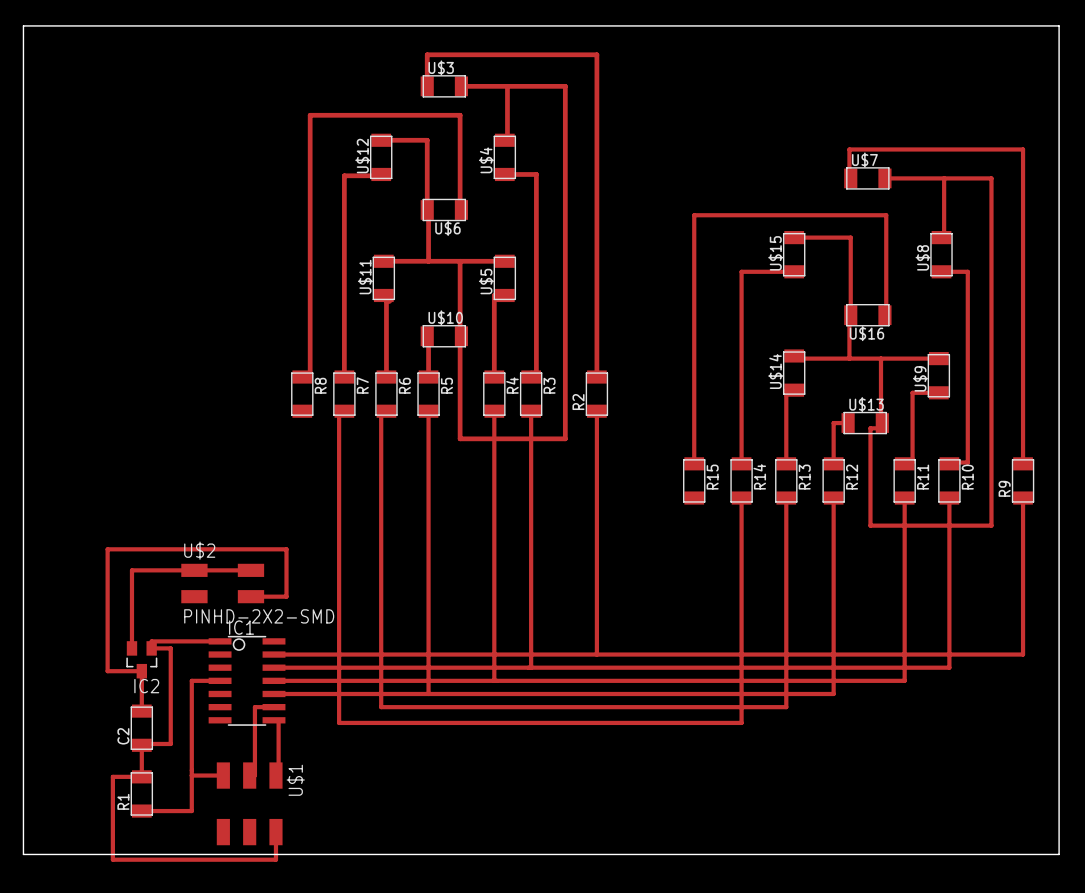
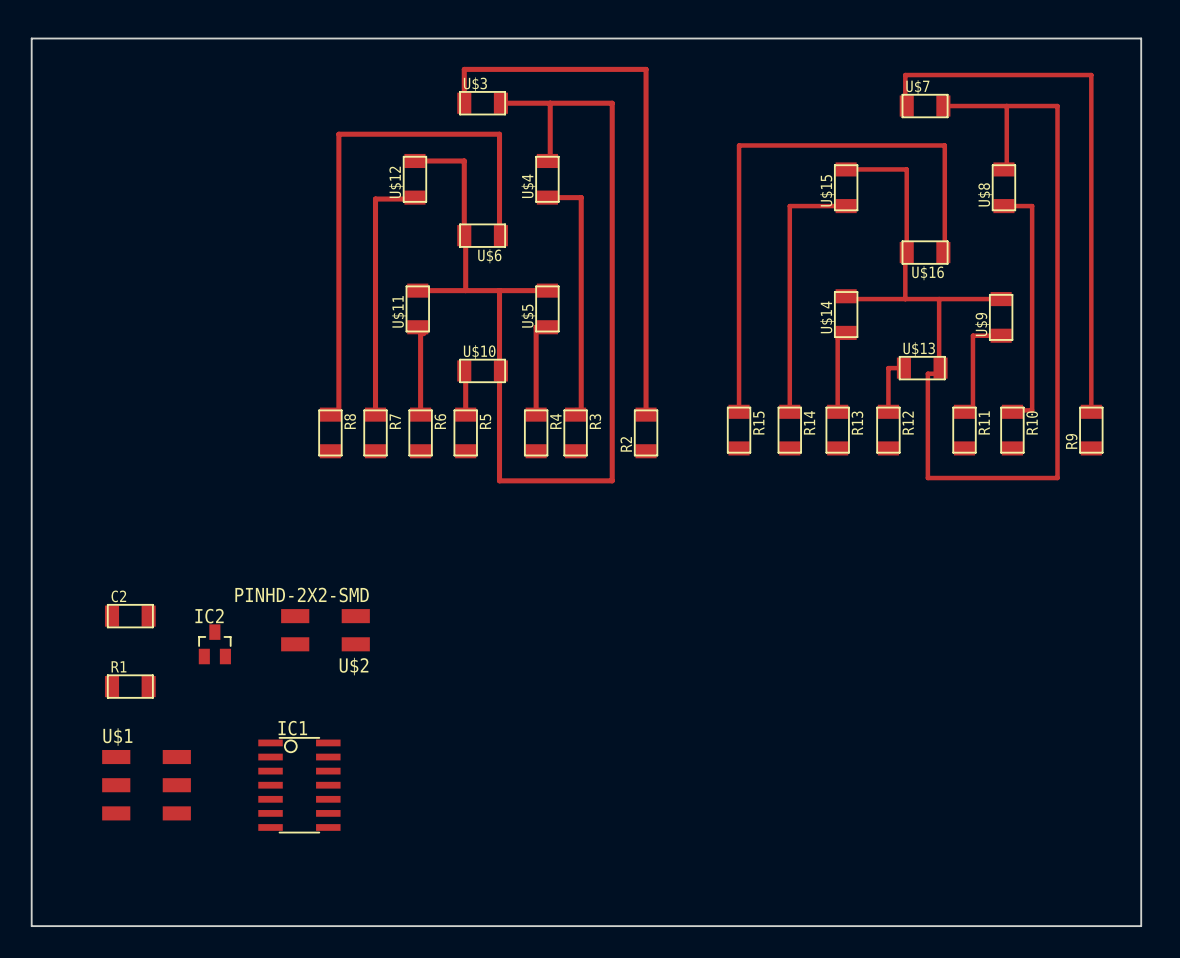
top track: (850, 178) (849, 149) (1023, 149) (1023, 463) -> (906, 106) (905, 75) (1091, 75) (1091, 411)
U$7 position: (867, 178) -> (925, 106)
top track: (884, 178) (991, 178) (991, 525) (870, 525) (870, 428) (882, 428) (881, 358) -> (943, 106) (1057, 106) (1057, 478) (927, 478) (927, 373) (940, 373) (939, 299)
top track: (944, 178) (944, 237) (941, 237) -> (1006, 106) (1006, 169) (1003, 169)
top track: (794, 237) (850, 237) (849, 358) -> (846, 169) (906, 169) (905, 299)
U$15 position: (794, 254) -> (846, 187)
U$8 position: (941, 254) -> (1003, 187)
top track: (794, 271) (741, 271) (741, 463) -> (846, 206) (789, 206) (789, 411)
top track: (941, 271) (967, 271) (967, 462) (949, 463) -> (1003, 206) (1032, 206) (1032, 410) (1012, 411)
U$16 position: (867, 315) -> (925, 252)
top track: (884, 315) (886, 215) (694, 215) (694, 463) -> (943, 252) (944, 145) (739, 145) (739, 411)
top track: (794, 355) (794, 358) (938, 358) -> (846, 296) (846, 299) (1001, 299)
U$14 position: (794, 373) -> (846, 314)
U$9 position: (938, 375) -> (1001, 317)
top track: (794, 390) (786, 390) (786, 463) -> (846, 332) (837, 332) (837, 411)
top track: (938, 392) (912, 392) (912, 462) (904, 463) -> (1001, 335) (972, 335) (972, 410) (964, 411)
top track: (344, 411) (339, 411) (339, 722) (741, 722) (741, 498) -> none
top track: (386, 411) (381, 411) (381, 707) (786, 707) (786, 498) -> none
top track: (428, 411) (428, 694) -> none
top track: (494, 411) (494, 680) -> none
top track: (531, 411) (531, 667) -> none
top track: (596, 411) (596, 654) -> none
top track: (848, 423) (833, 423) (833, 463) -> (903, 368) (888, 368) (888, 411)
U$13 position: (865, 423) -> (922, 368)
R15 position: (694, 480) -> (739, 430)
R14 position: (741, 480) -> (789, 430)
R13 position: (786, 480) -> (837, 430)
R12 position: (833, 480) -> (888, 430)
R11 position: (904, 480) -> (964, 430)
R10 position: (949, 480) -> (1012, 430)
R9 position: (1023, 480) -> (1091, 430)
top track: (833, 498) (833, 694) (274, 694) -> none
top track: (904, 498) (904, 680) (274, 680) -> none
top track: (949, 498) (949, 667) (274, 667) -> none
top track: (1023, 498) (1023, 654) (274, 654) -> none
U$2 name position: U$2 (199, 550) -> U$2 (354, 666)
top track: (250, 570) (131, 570) (131, 648) -> none
U$2 position: (222, 583) -> (325, 630)
top track: (250, 596) (286, 596) (286, 549) (107, 549) (107, 671) (141, 671) (141, 711) -> none
U$2 value position: PINHD-2X2-SMD (259, 616) -> PINHD-2X2-SMD (302, 594)
top track: (220, 641) (151, 641) (151, 648) (170, 648) (170, 743) (141, 743) (141, 776) (112, 776) (112, 859) (275, 859) (275, 832) -> none
IC2 rotation: 0° (141, 659) -> 180° (214, 644)
IC2 position: (141, 659) -> (214, 644)
top track: (220, 680) (191, 680) (191, 811) (141, 811) -> none
IC1 position: (247, 680) -> (299, 785)
top track: (274, 707) (254, 707) (254, 775) (249, 775) -> none
top track: (274, 720) (278, 720) (278, 775) (275, 775) -> none
C2 rotation: 0° (141, 728) -> 90° clockwise (130, 616)
C2 position: (141, 728) -> (130, 616)
top track: (191, 775) (223, 775) -> none
U$1 name position: U$1 (295, 780) -> U$1 (117, 737)
R1 rotation: 0° (141, 793) -> 90° clockwise (130, 686)
R1 position: (141, 793) -> (130, 686)
U$1 rotation: 0° (249, 803) -> 90° clockwise (146, 785)
U$1 position: (249, 803) -> (146, 785)

